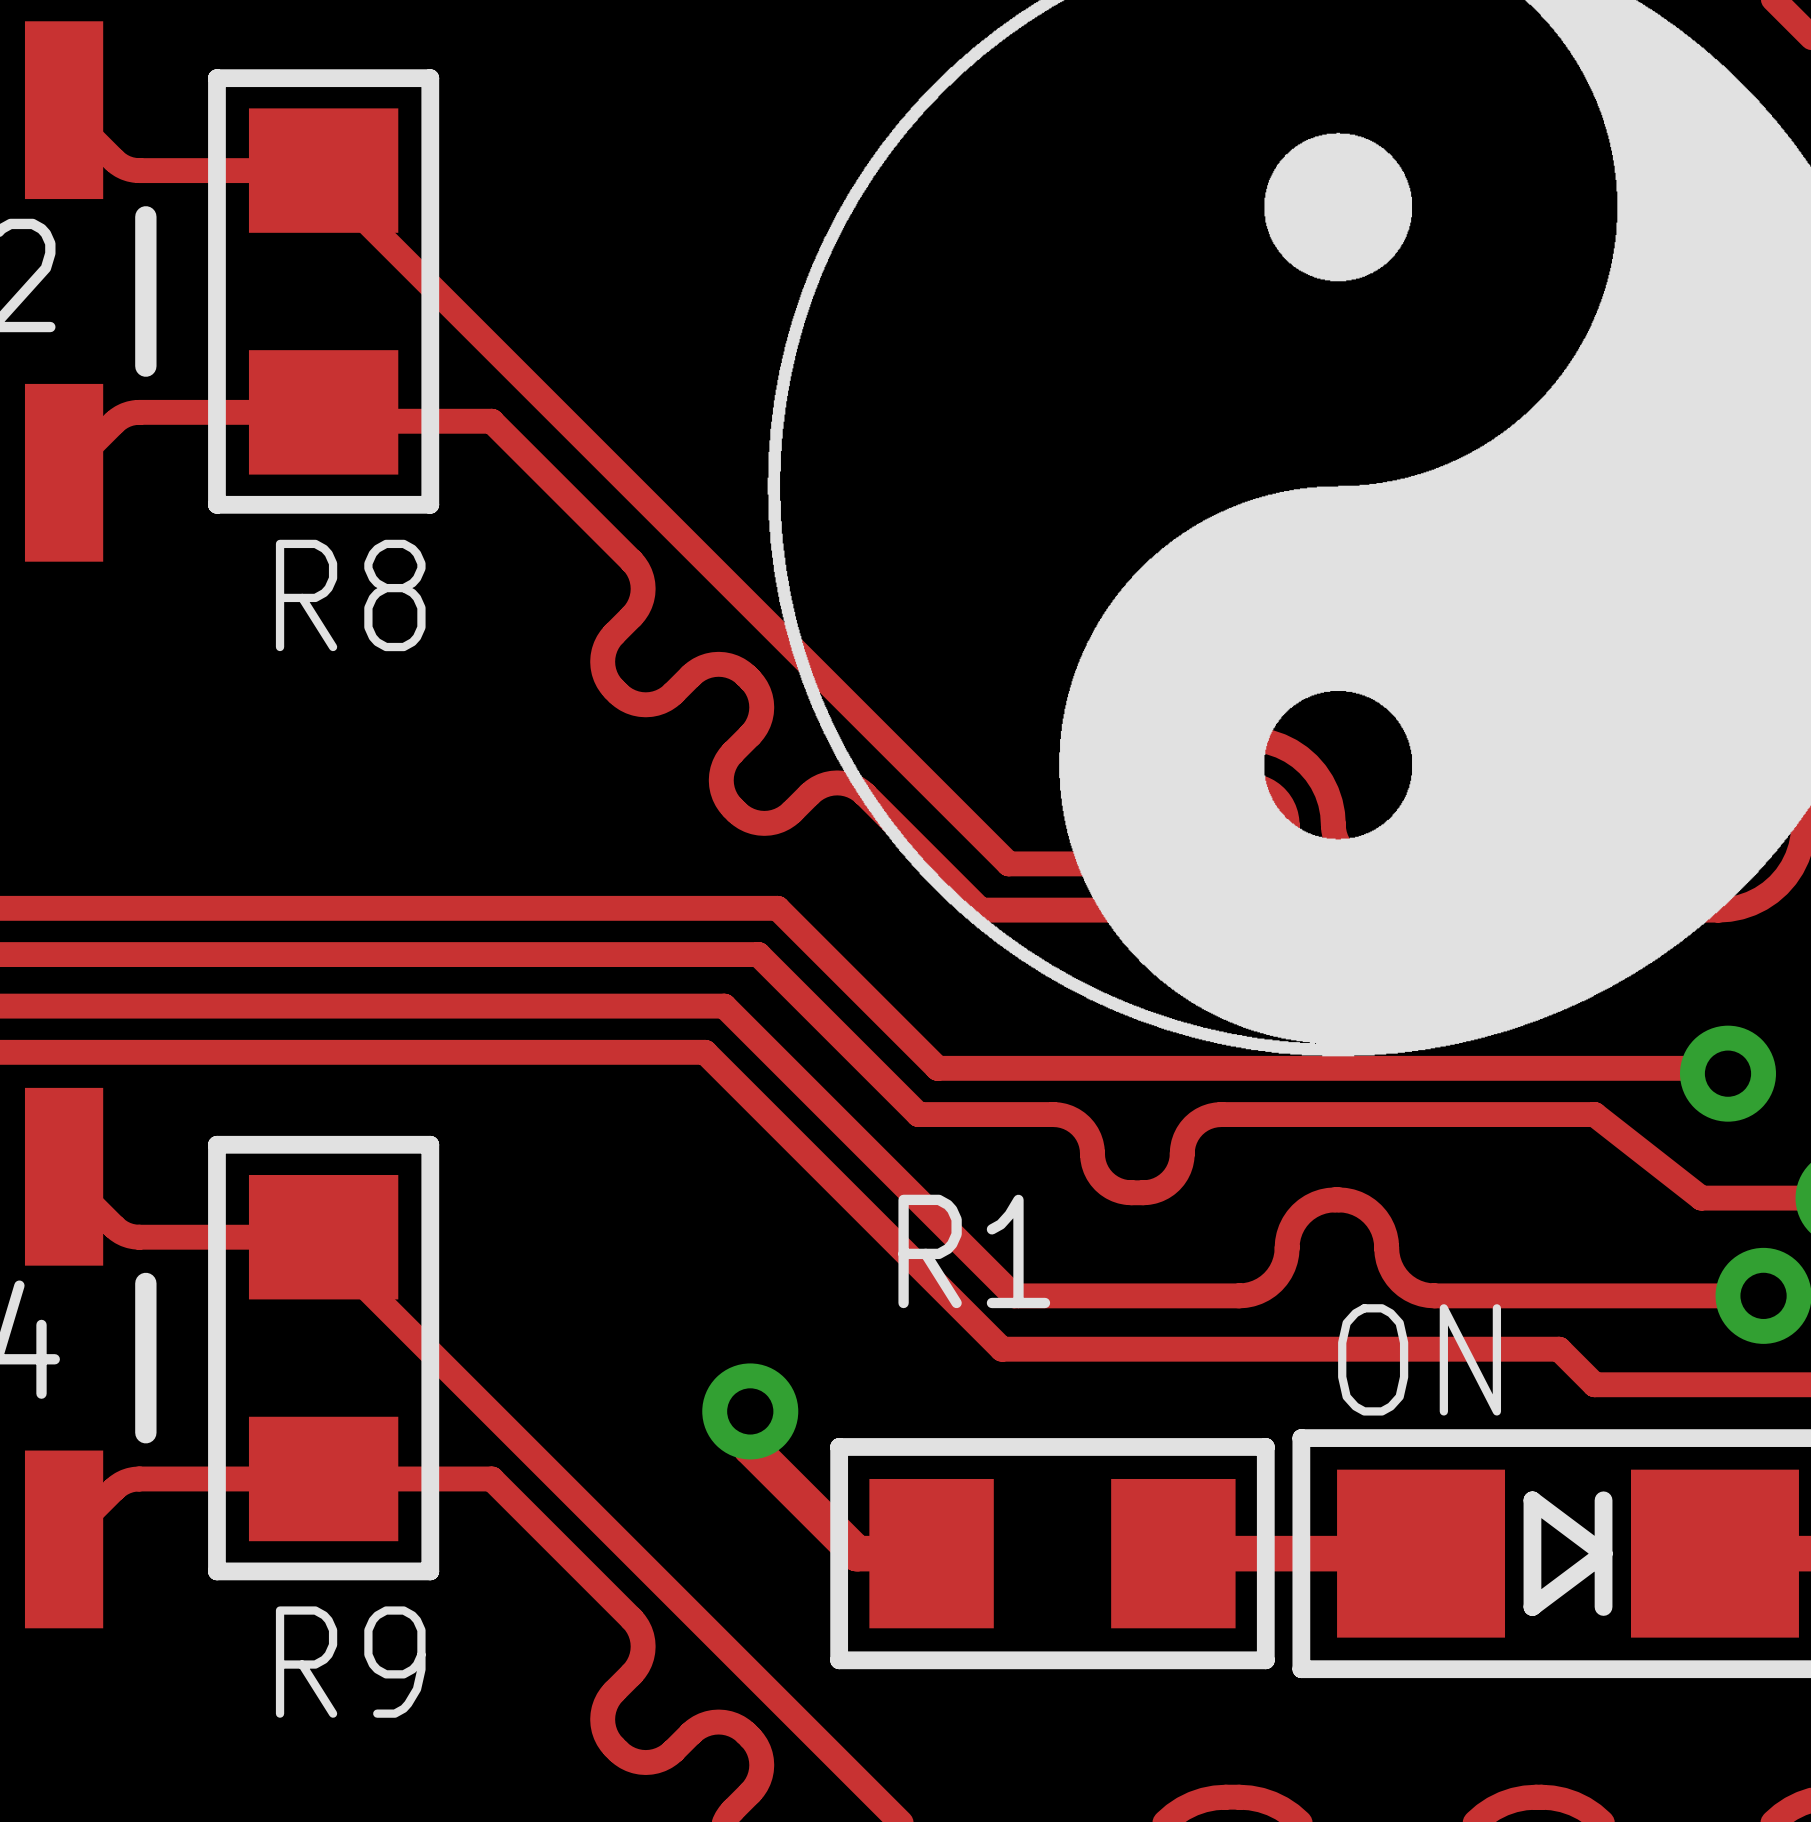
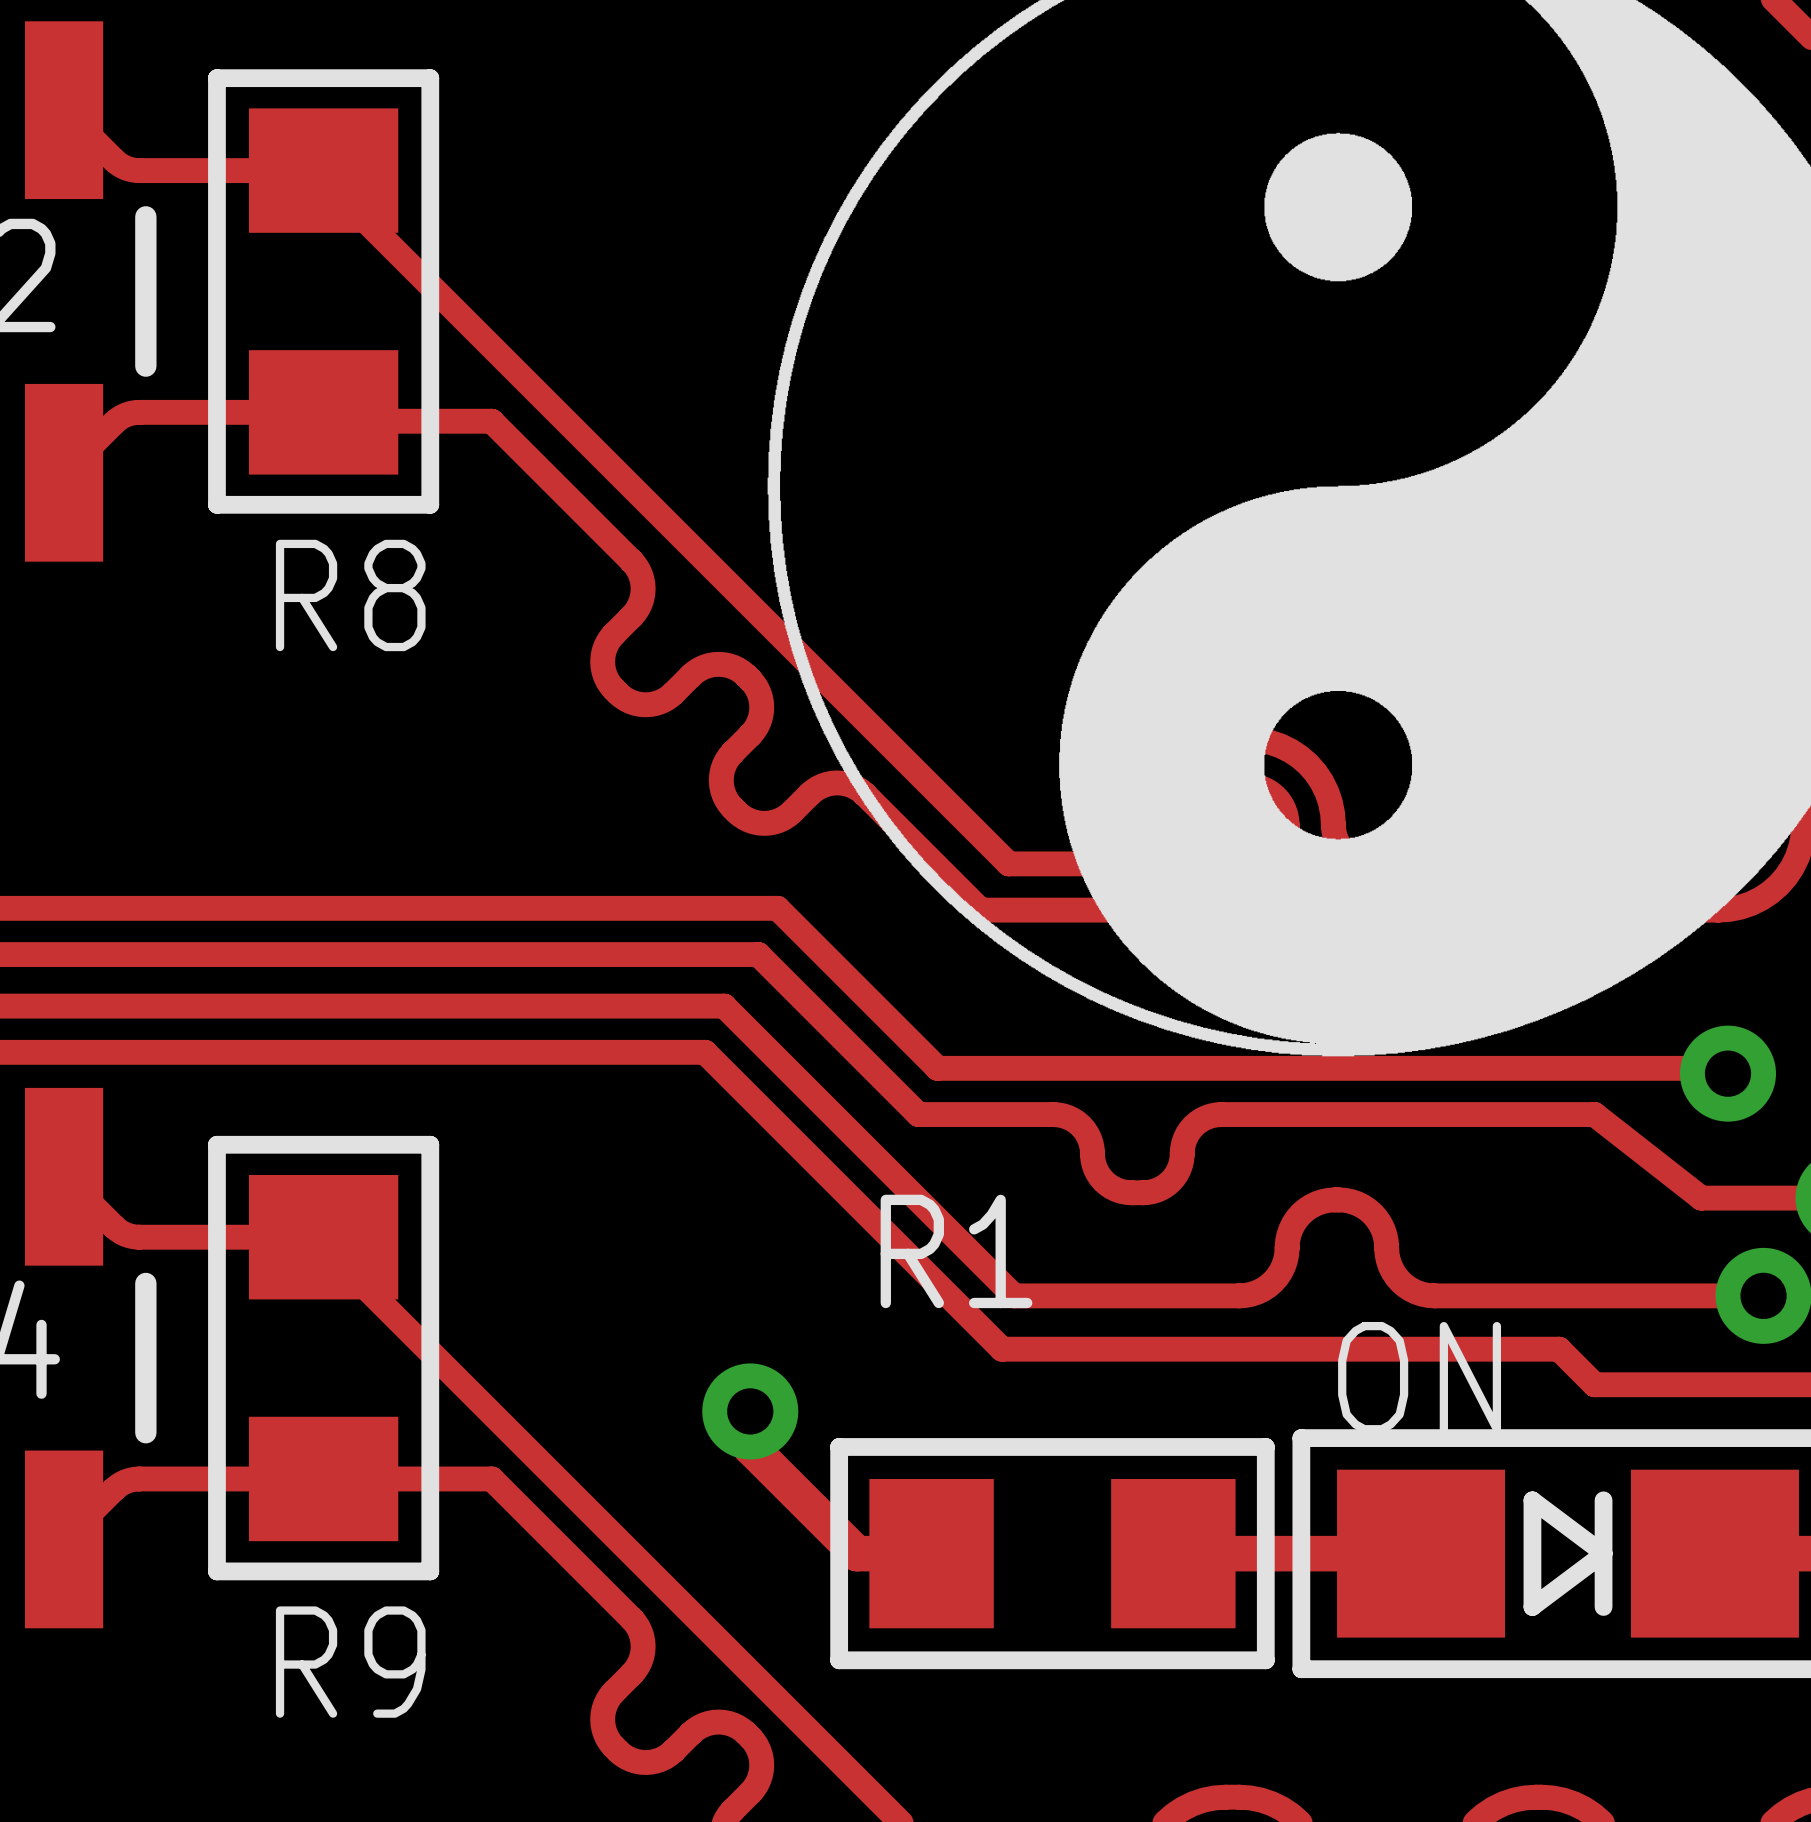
R1 name position: R1 (974, 1251) -> R1 (956, 1251)
ON name position: ON (1419, 1359) -> ON (1419, 1377)

